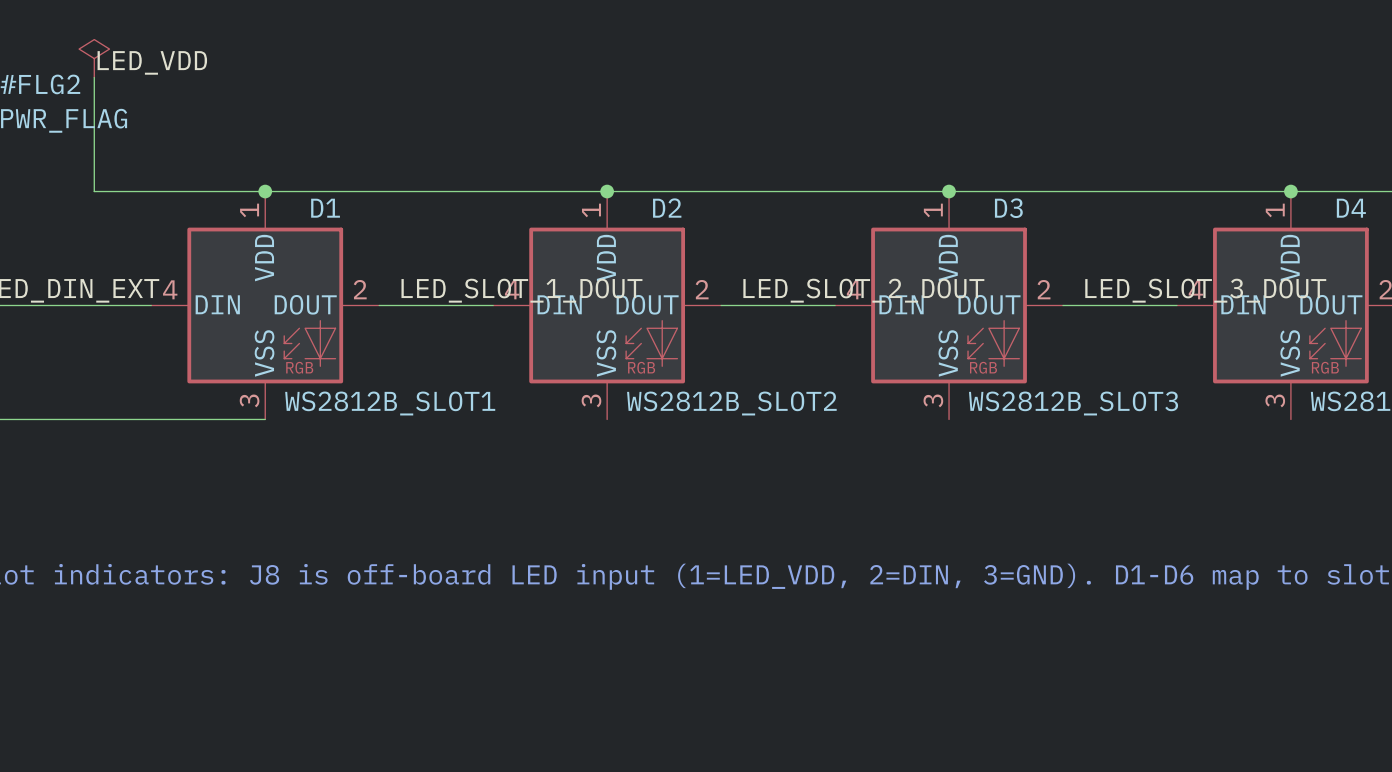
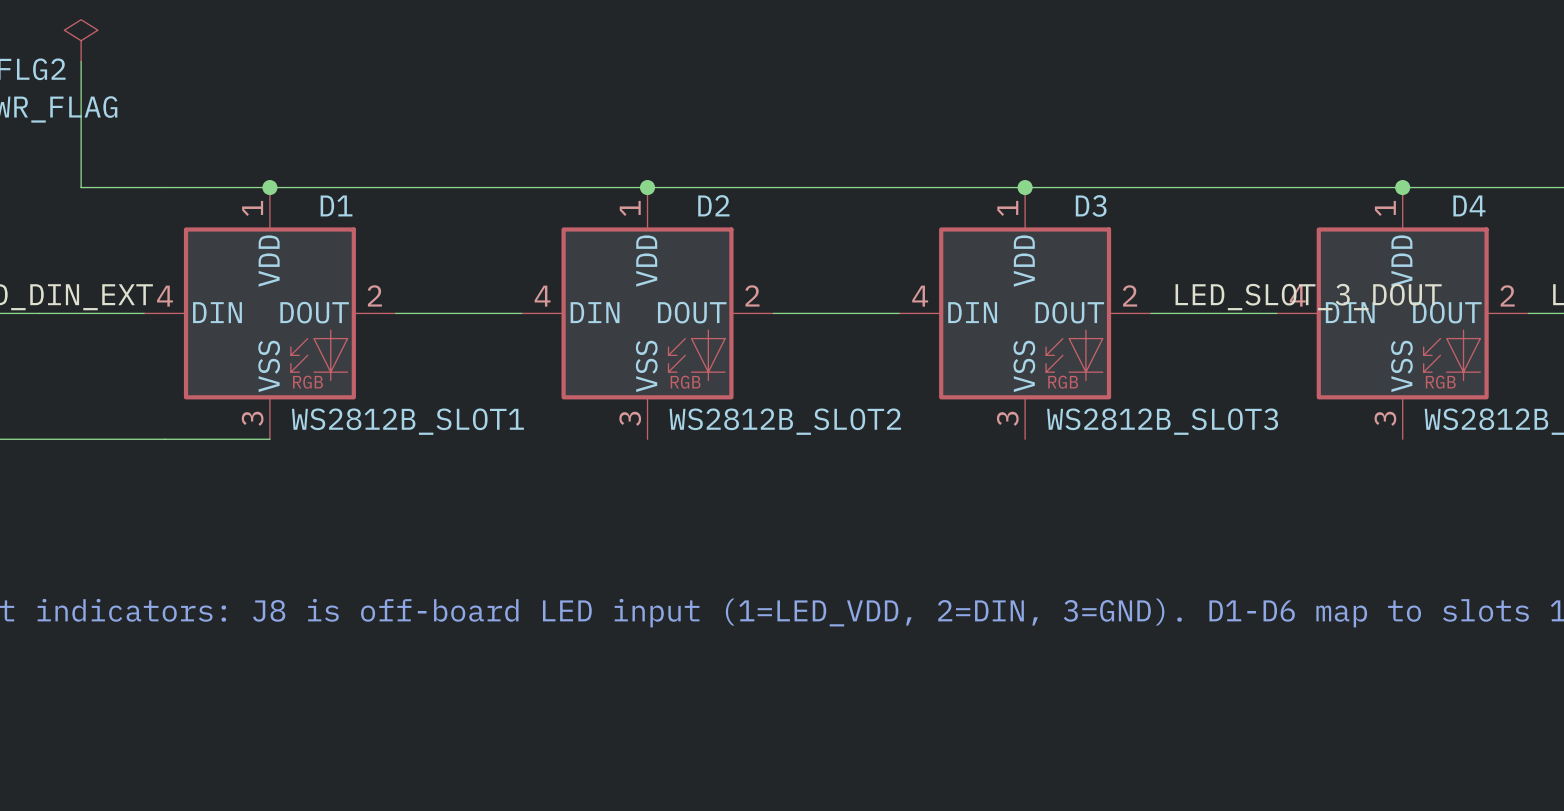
label: LED_VDD (152, 62) -> none
label: LED_SLOT_1_DOUT (521, 290) -> none
label: LED_SLOT_2_DOUT (863, 290) -> none

